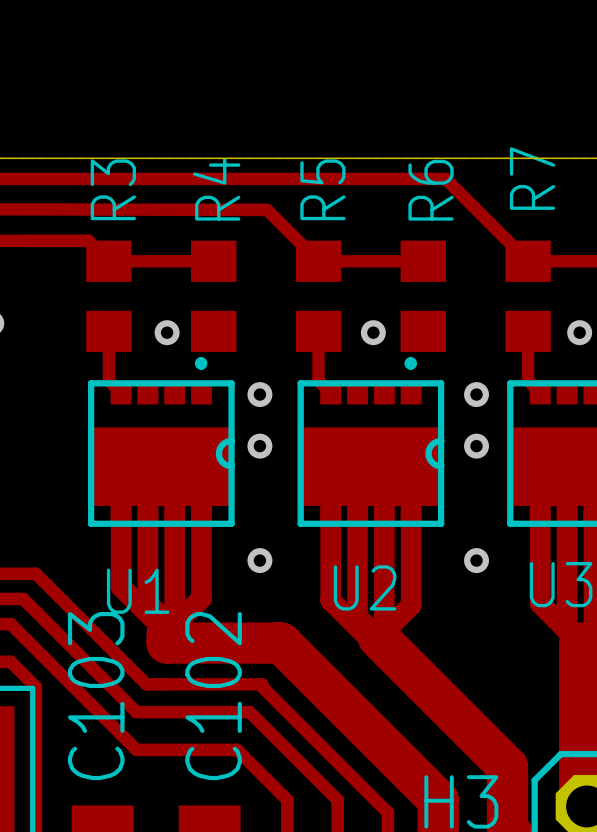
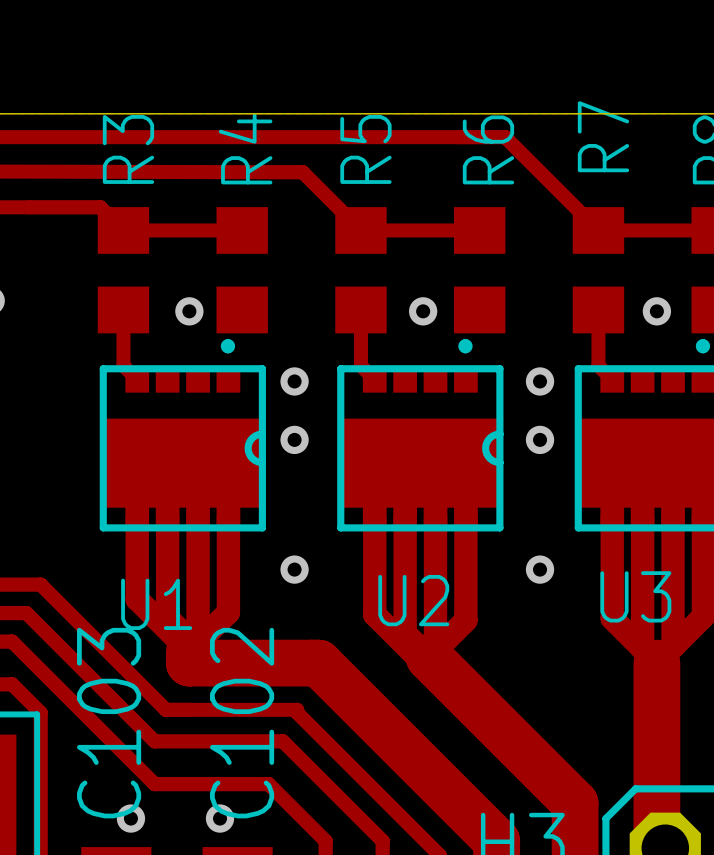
via: none -> (130, 818)
via: none -> (220, 818)

